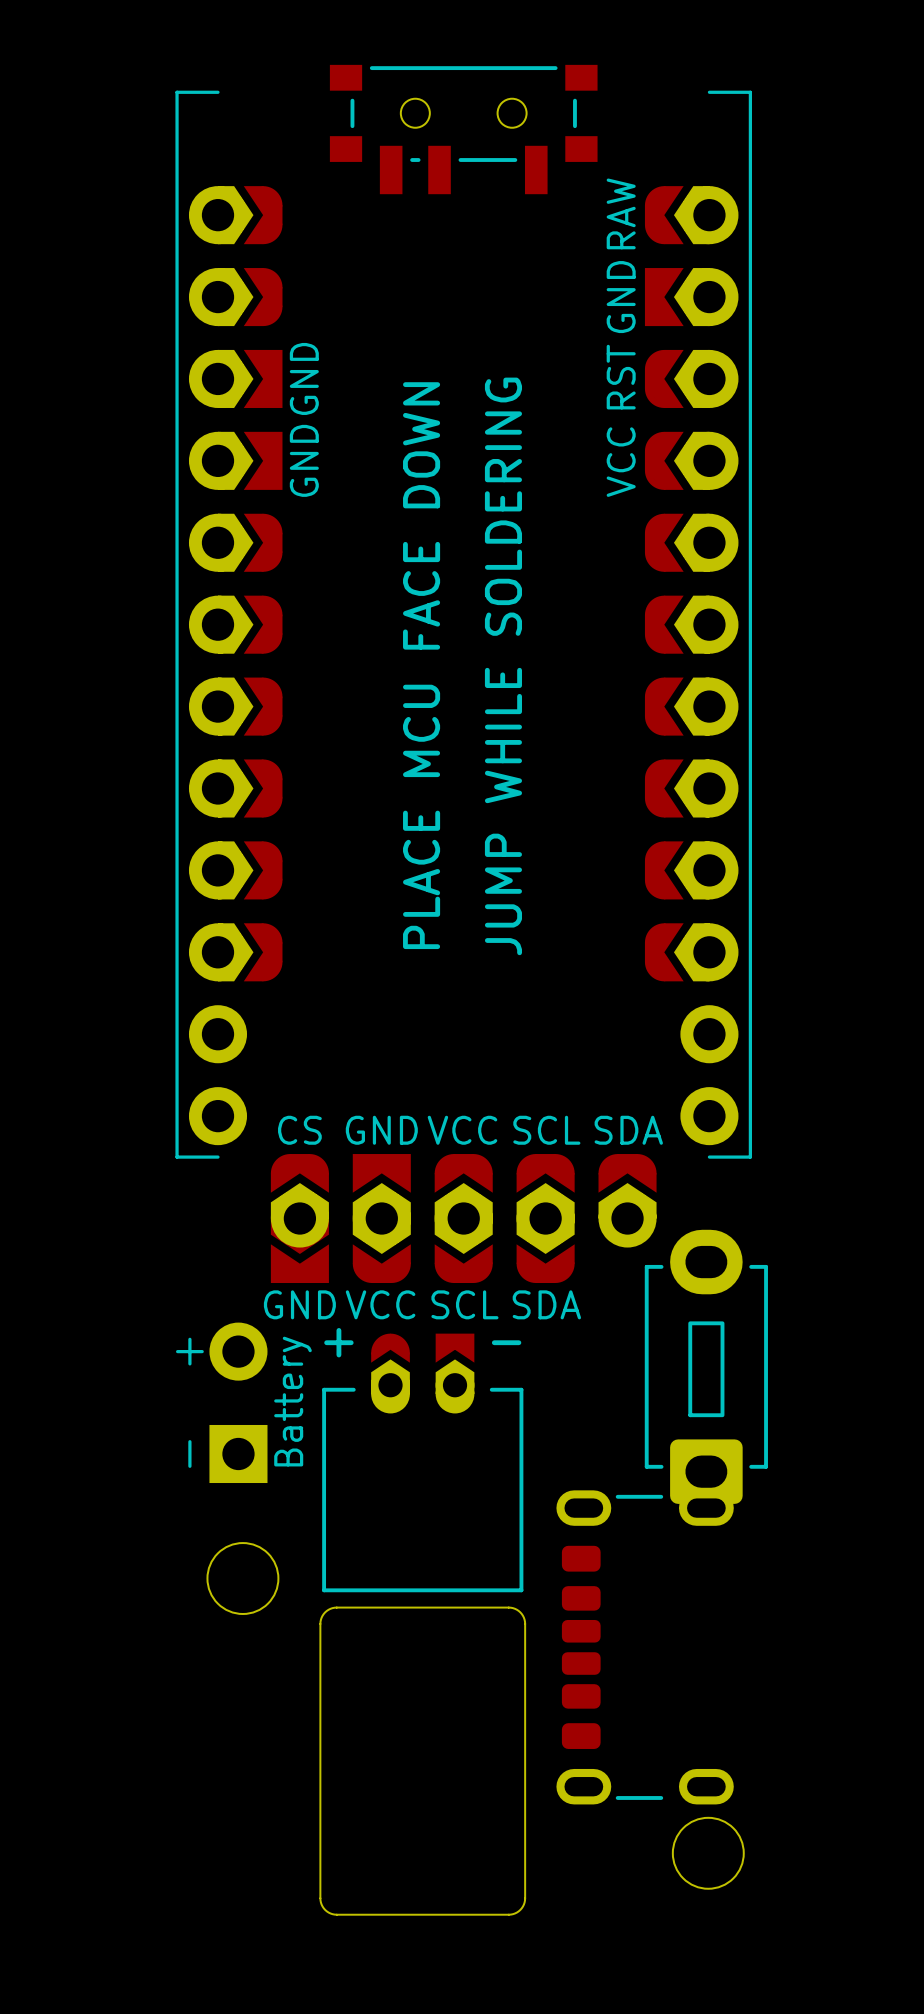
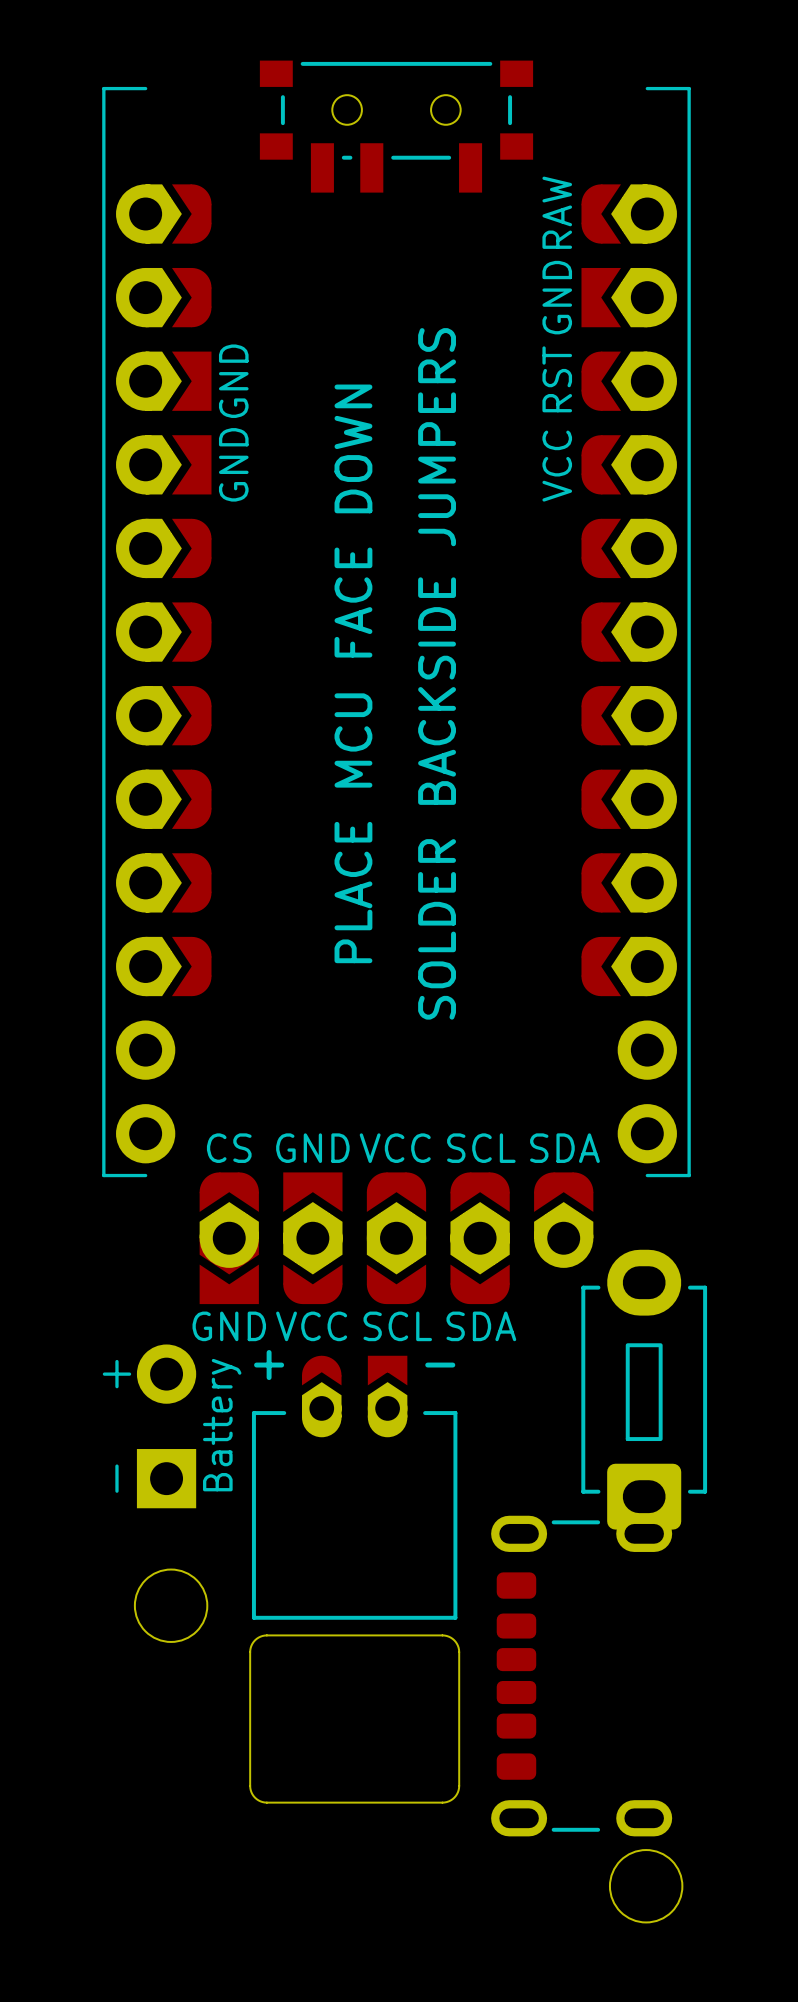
part text: JUMP WHILE SOLDERING (503, 666) -> SOLDER BACKSIDE JUMPERS (437, 673)
board edge: (320, 1755) (320, 1900) (326, 1911) (336, 1914) (508, 1914) (518, 1911) (523, 1904) (525, 1898) (525, 1755) -> (250, 1785) (255, 1797) (266, 1802) (444, 1802) (455, 1796) (459, 1785)

